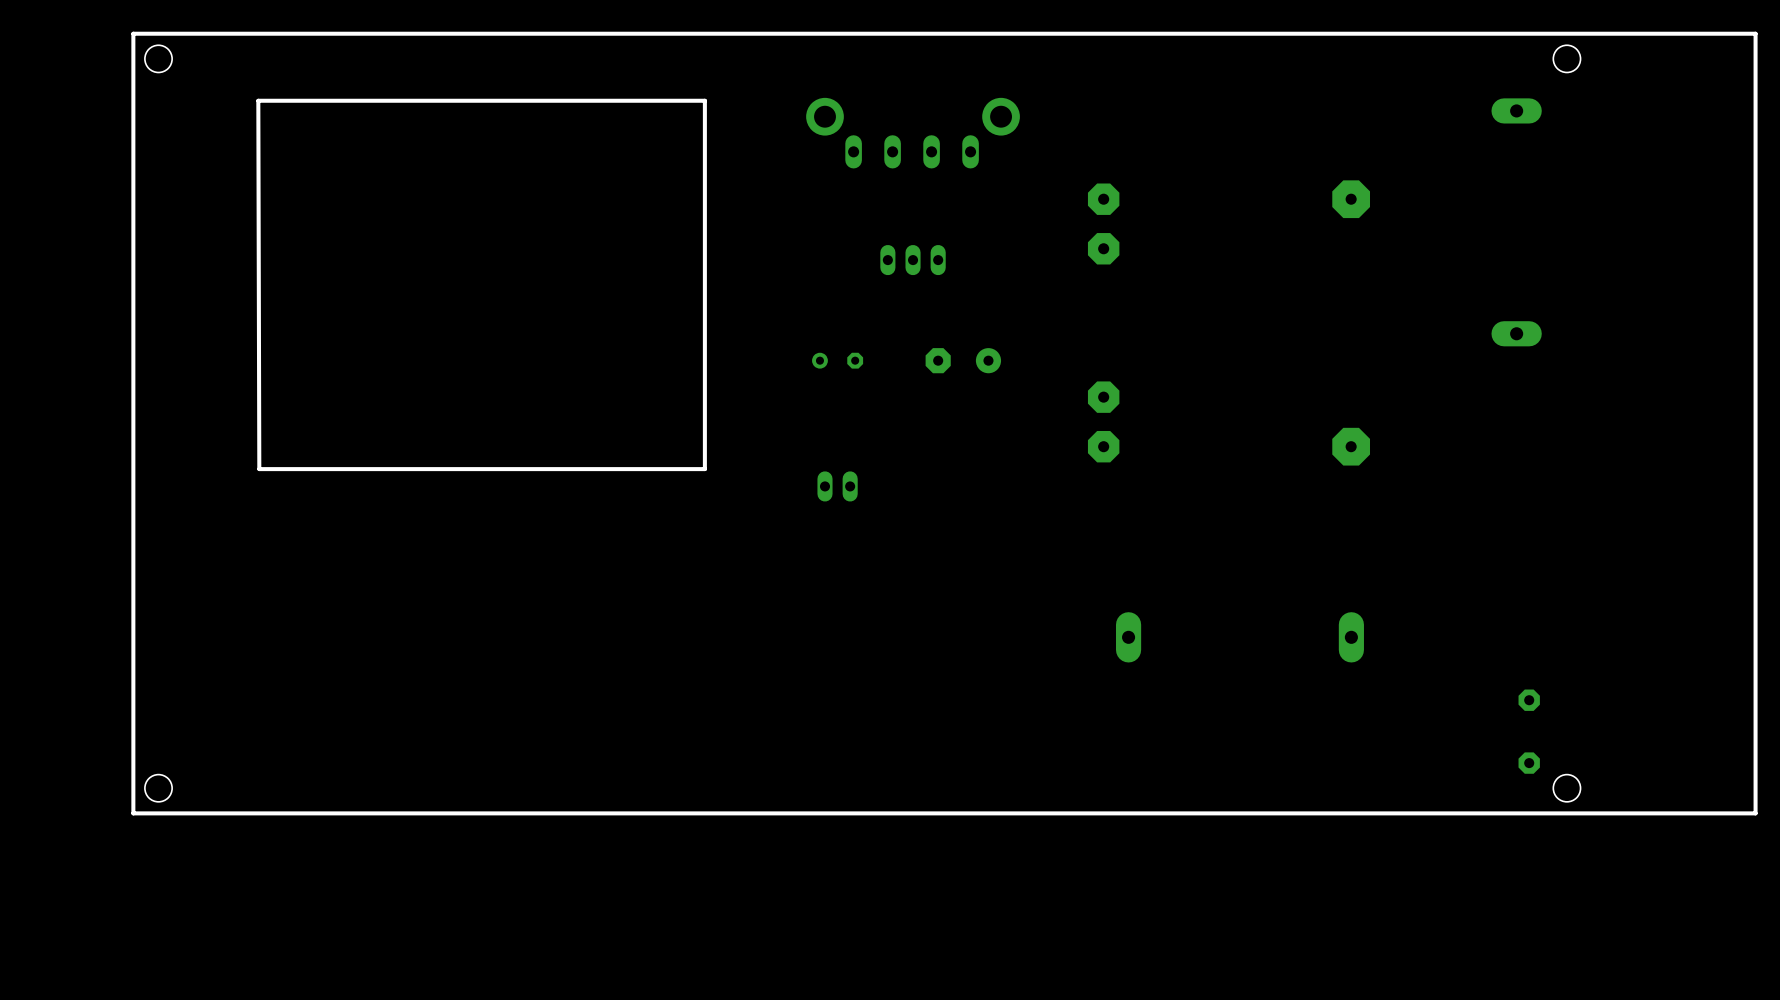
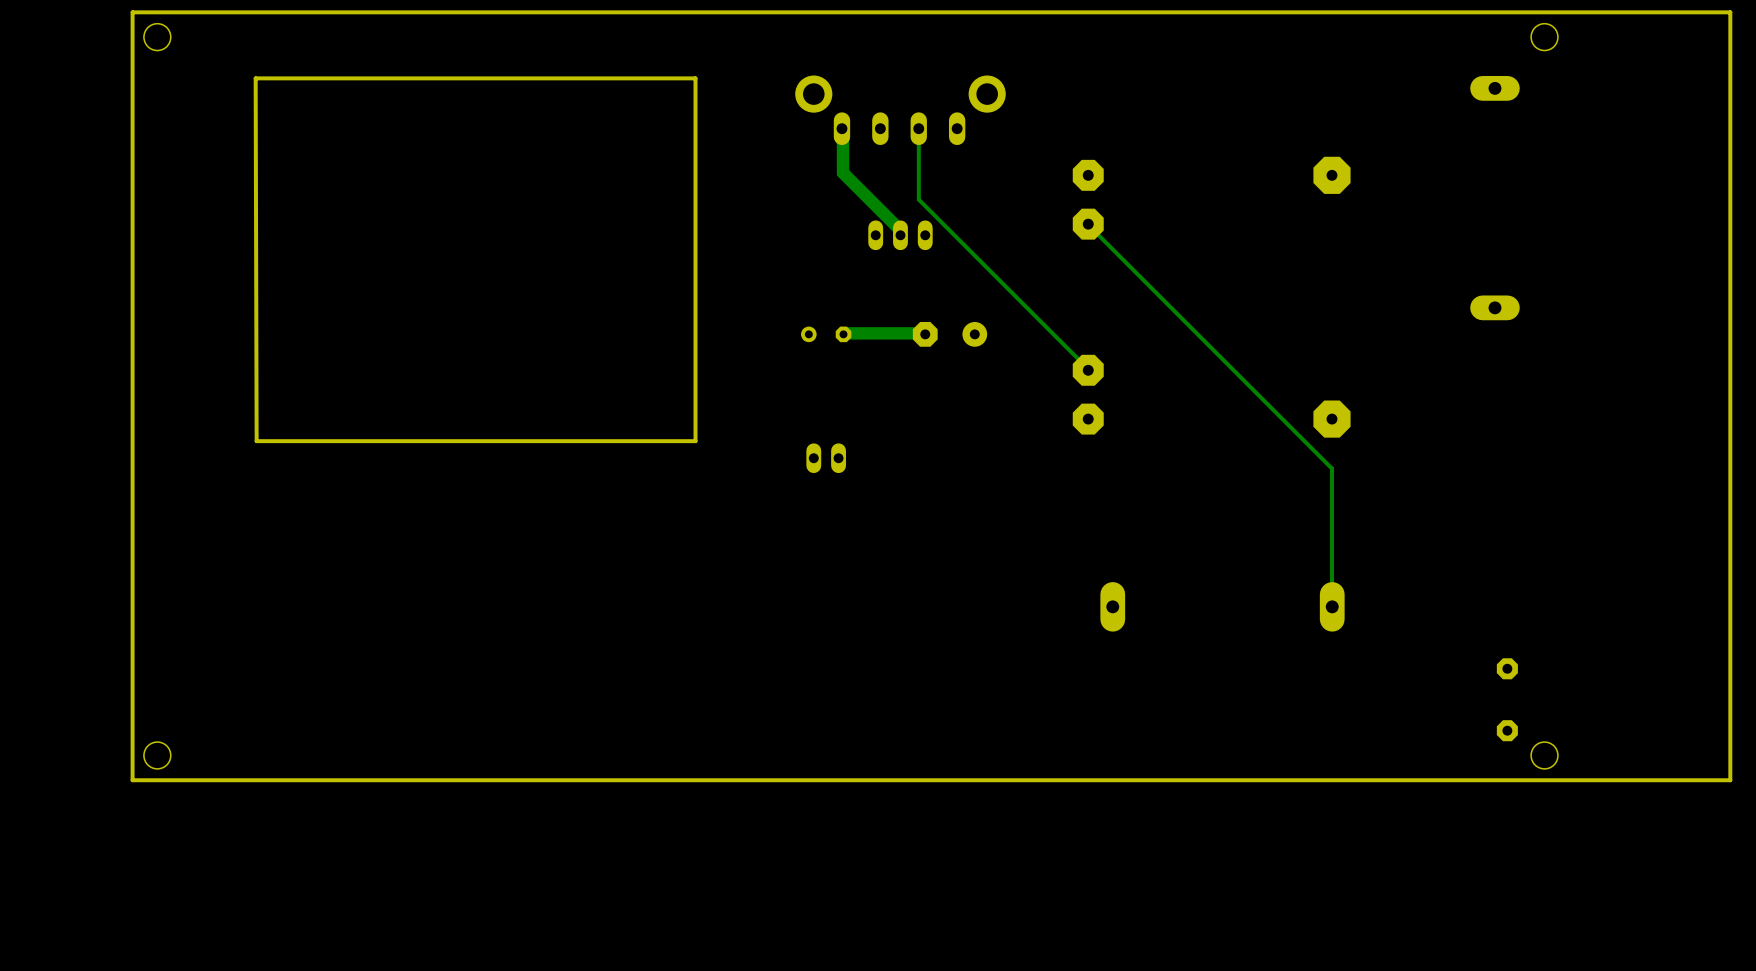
track: none -> (841, 128) (843, 172) (899, 229) (900, 235)
track: none -> (918, 128) (918, 199) (1088, 370)
track: none -> (1088, 224) (1331, 468) (1332, 606)
track: none -> (925, 334) (843, 334)

